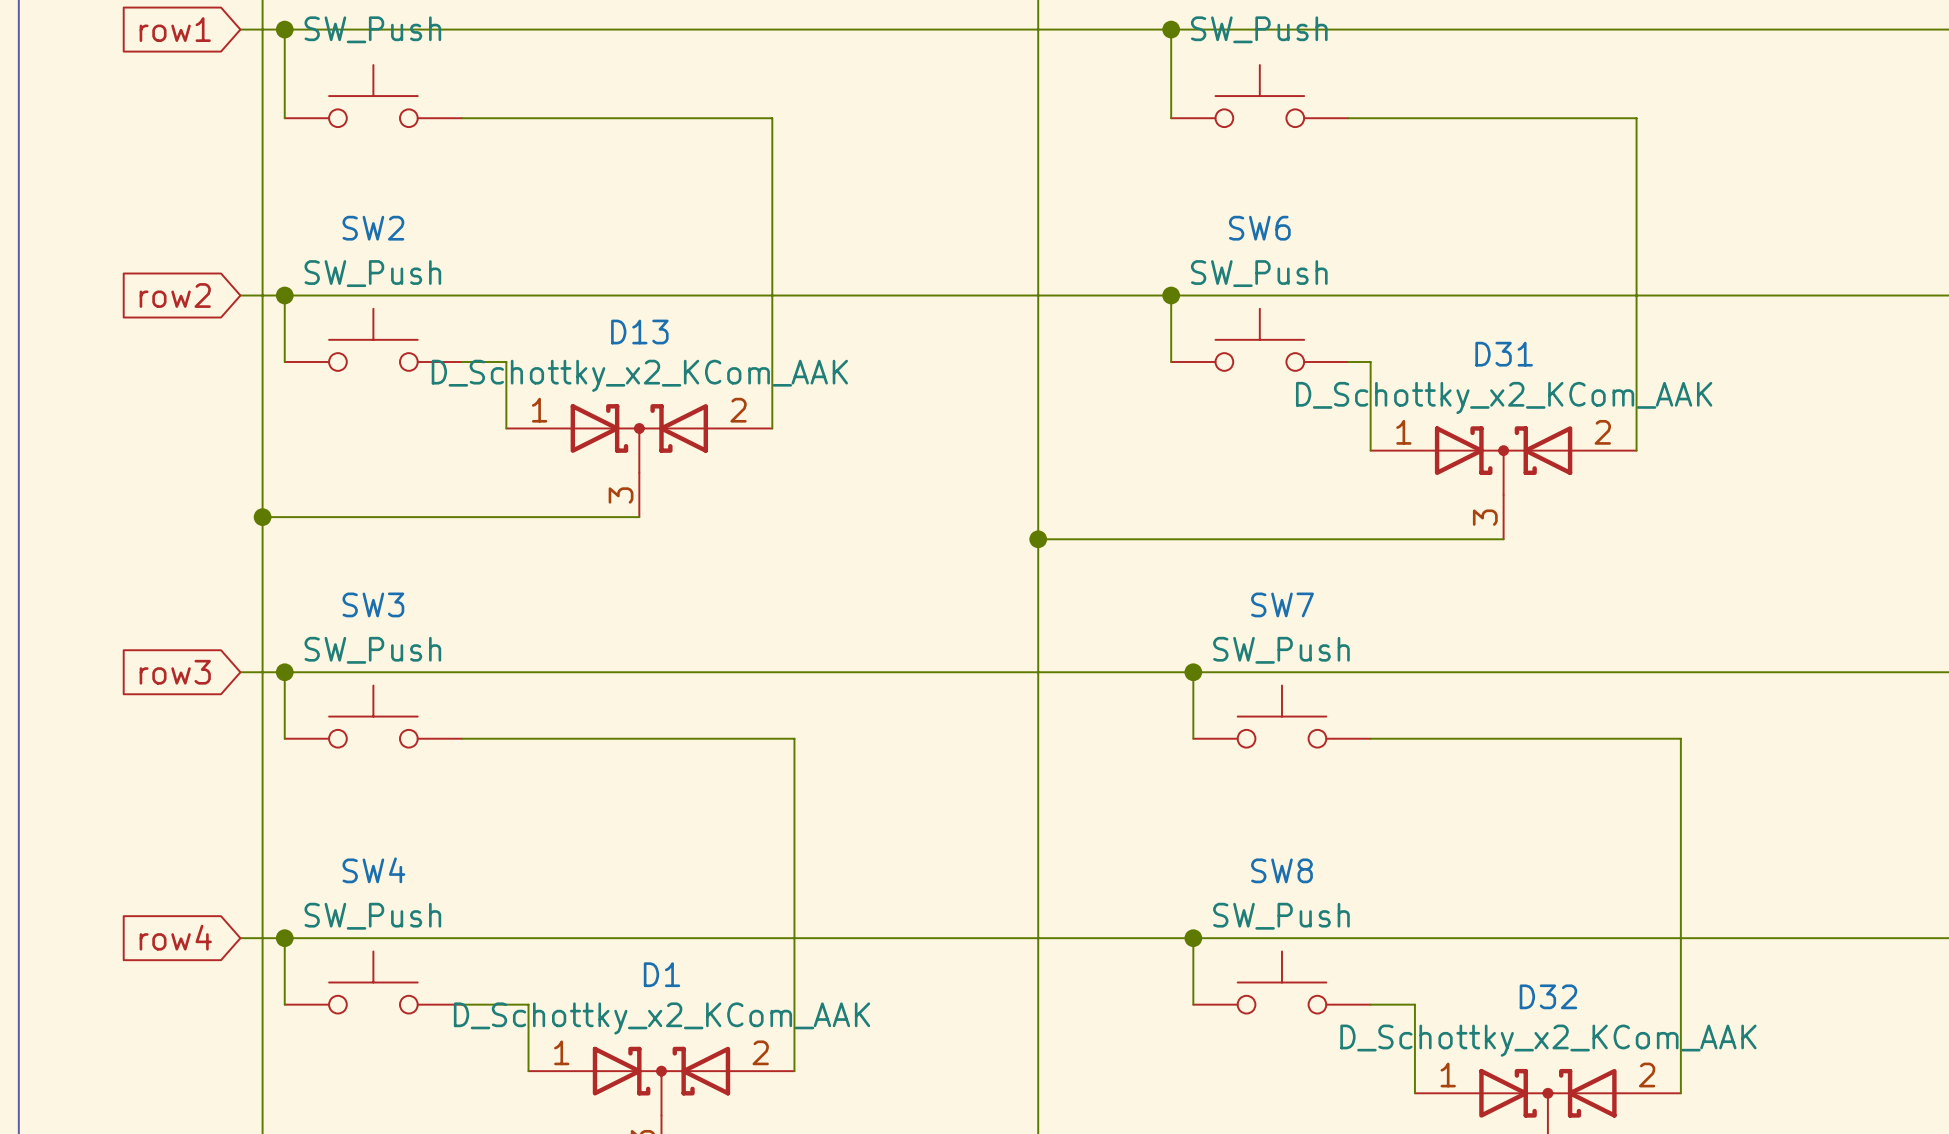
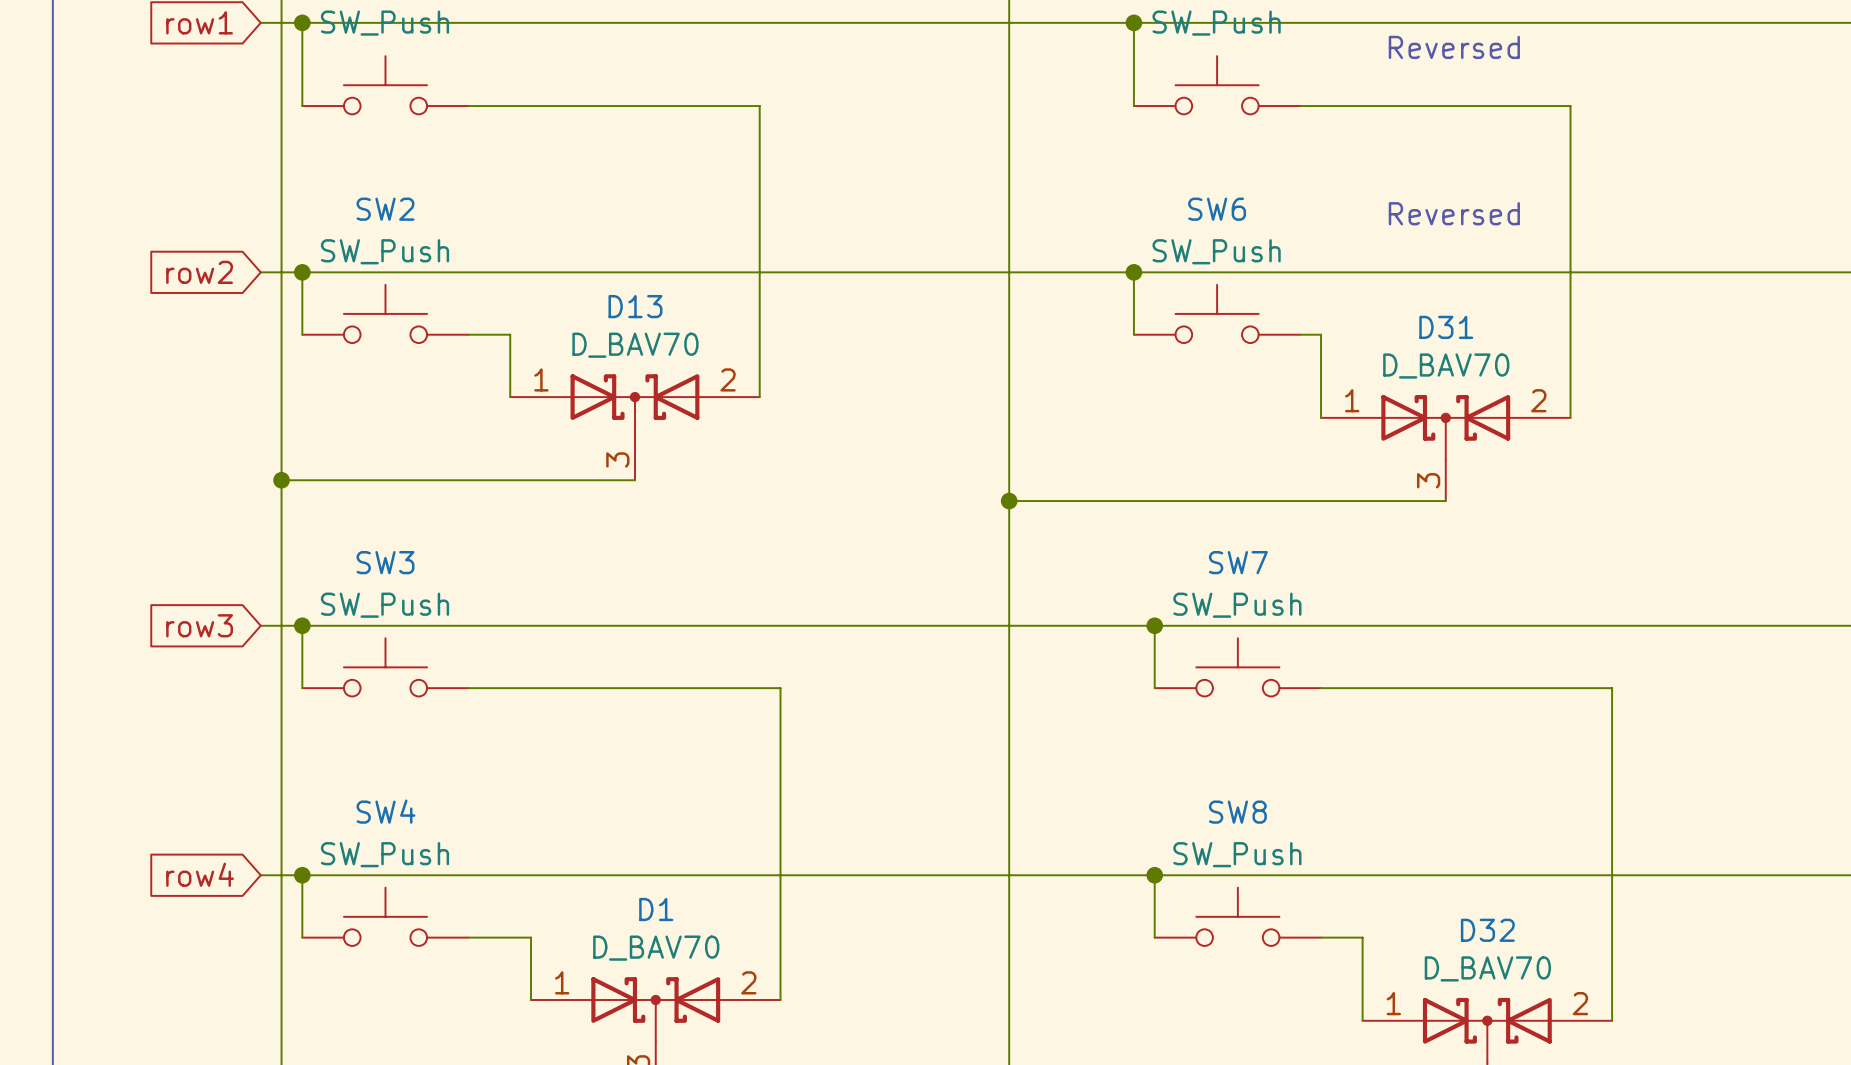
text: none -> Reversed (1454, 47)
text: none -> Reversed (1454, 213)
D13 value: D_Schottky_x2_KCom_AAK (639, 375) -> D_BAV70 (635, 345)
D31 value: D_Schottky_x2_KCom_AAK (1504, 397) -> D_BAV70 (1446, 366)
D1 value: D_Schottky_x2_KCom_AAK (662, 1018) -> D_BAV70 (656, 948)
D32 value: D_Schottky_x2_KCom_AAK (1548, 1040) -> D_BAV70 (1487, 968)

